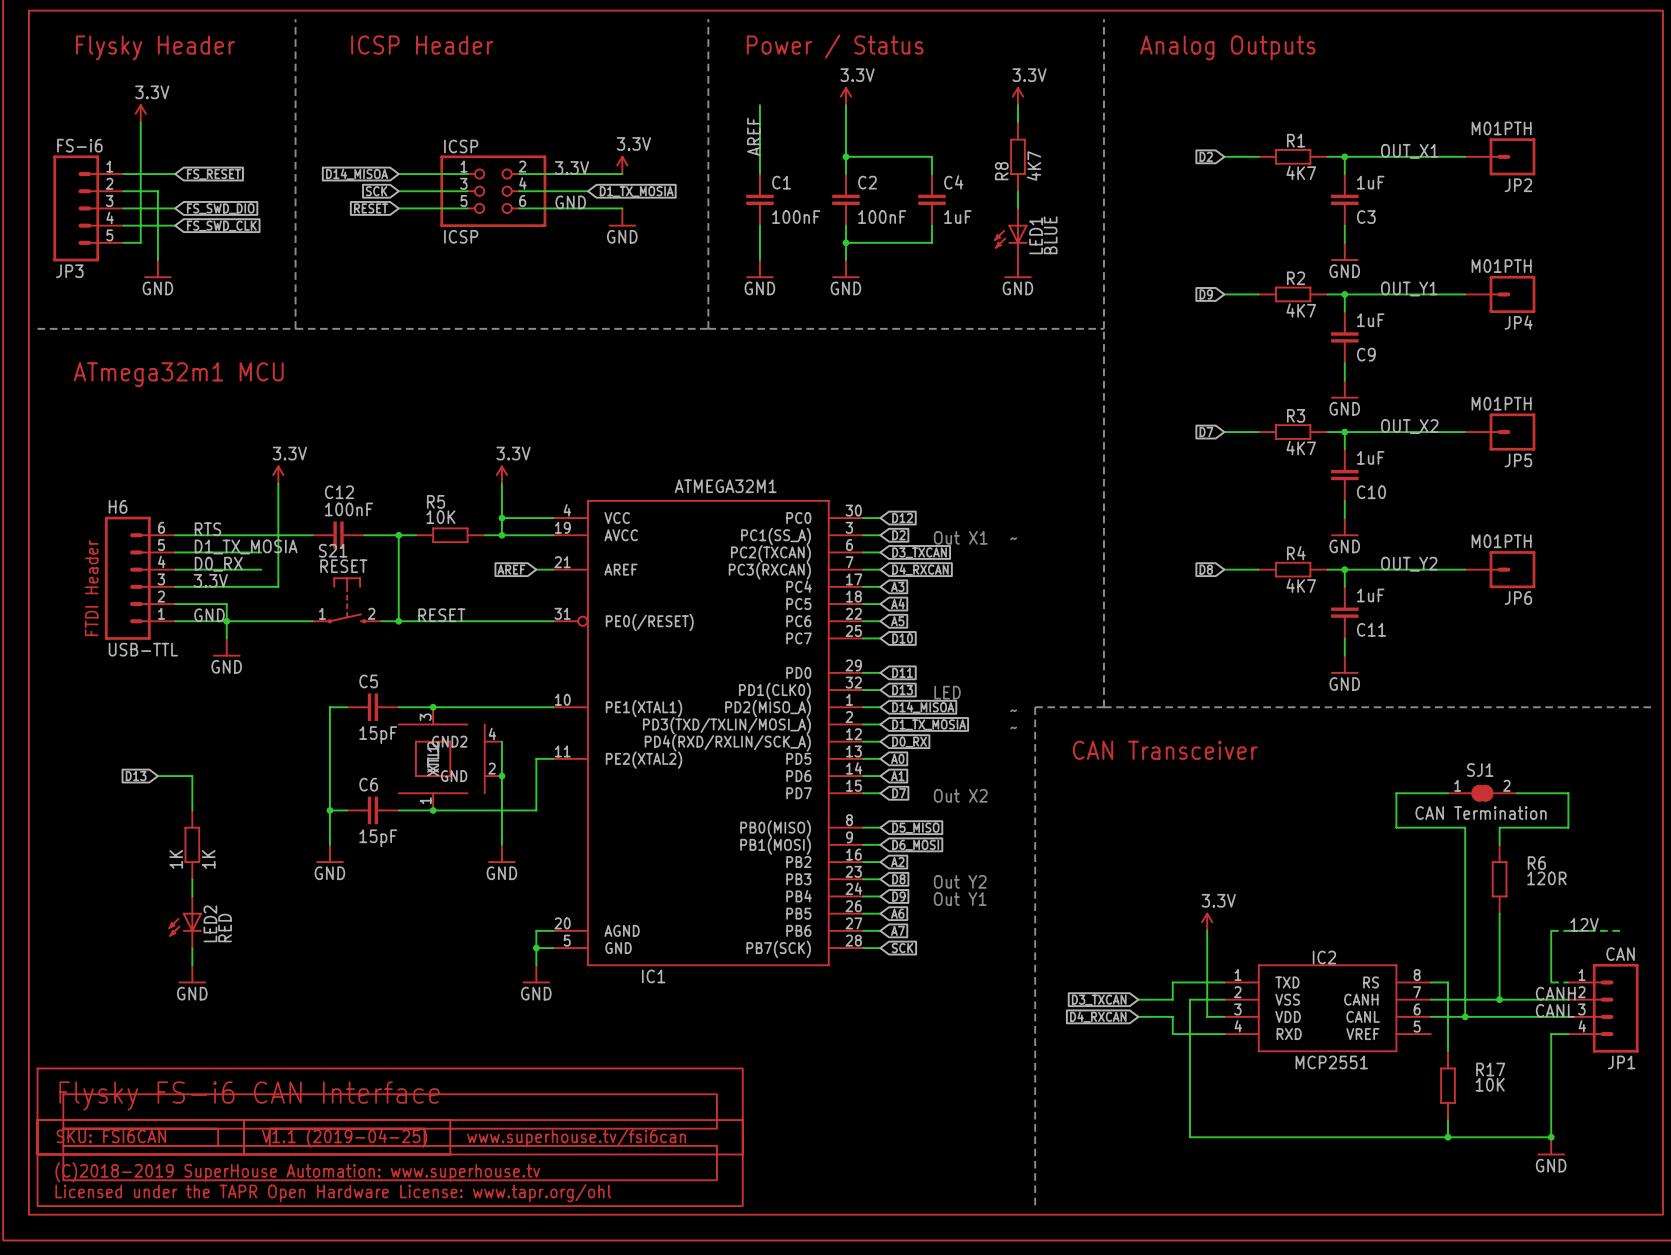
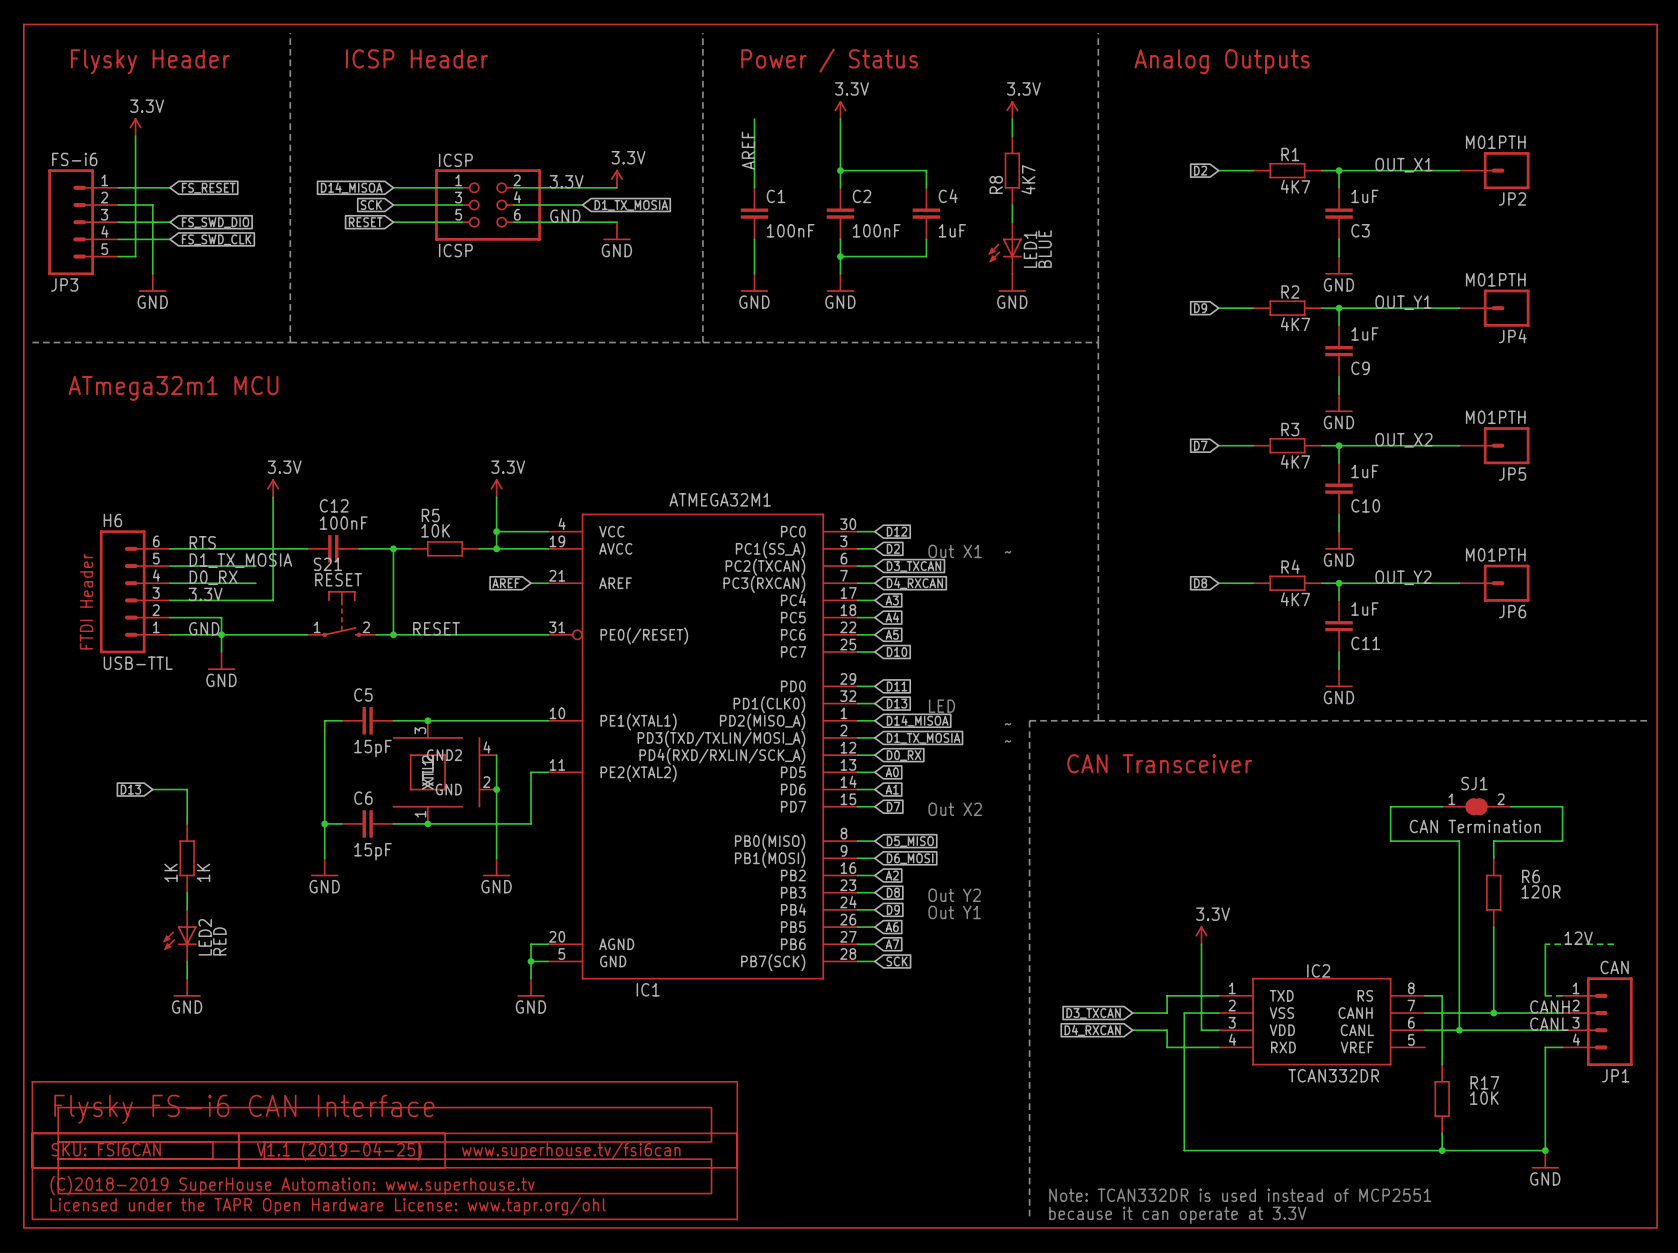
IC2 value: MCP2551 (1331, 1062) -> TCAN332DR (1333, 1075)
text: none -> Note: TCAN332DR is used instead of MCP2551 (1240, 1195)
text: none -> because it can operate at 3.3V (1177, 1215)

